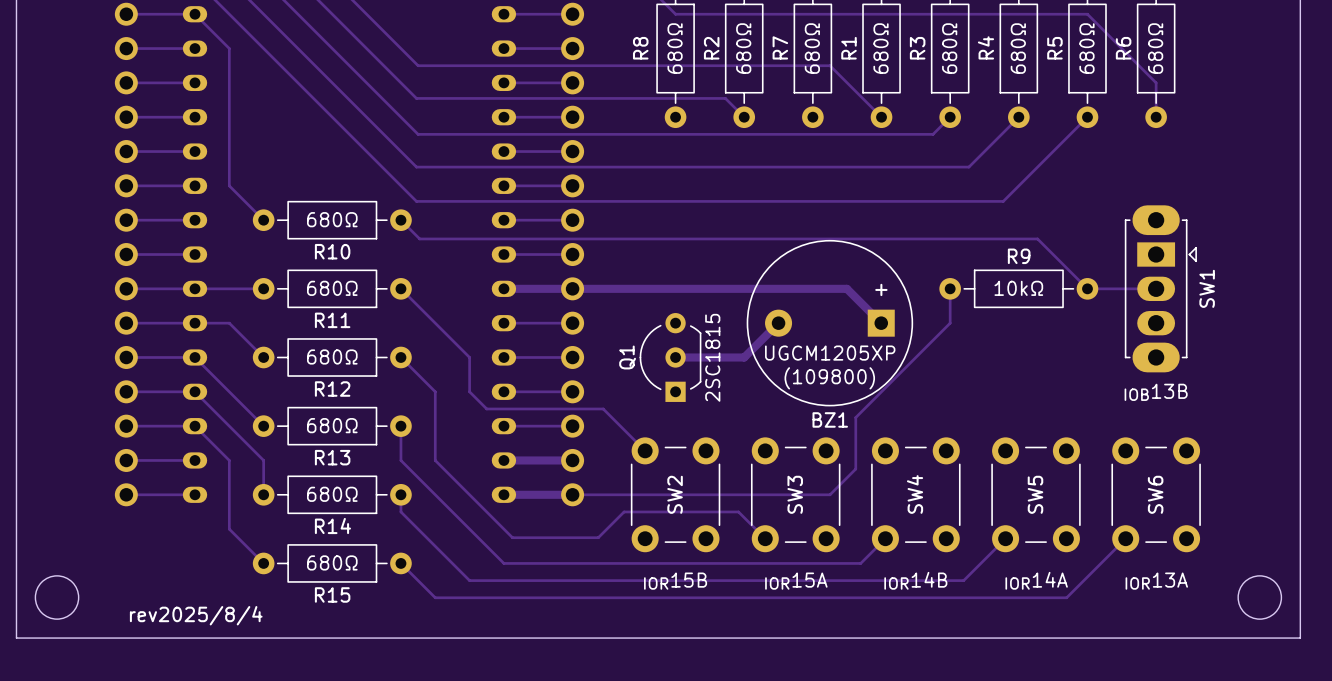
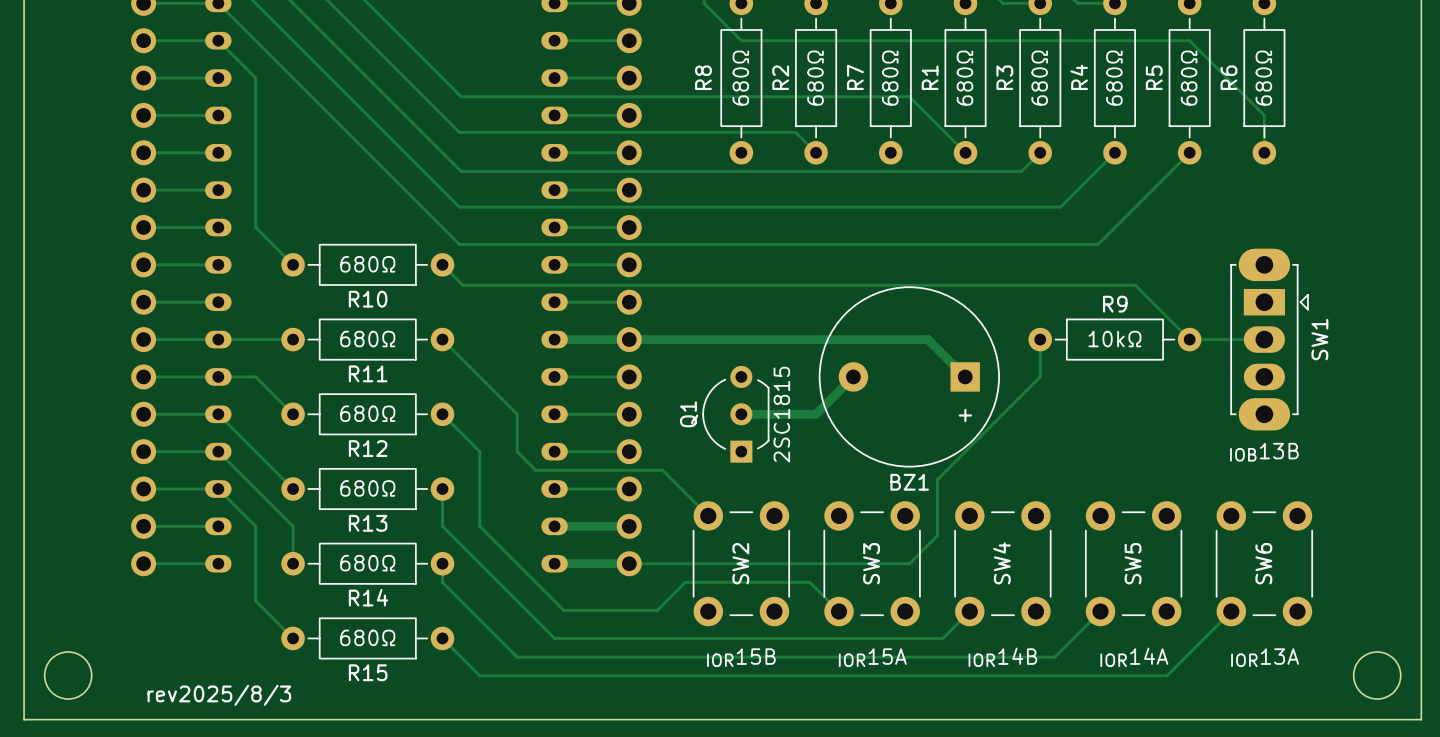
BZ1 text position: + (881, 289) -> + (965, 415)
BZ1 text: UGCM1205XP (830, 353) -> none
BZ1 text: (109800) (829, 378) -> none
text: rev2025/8/4 (196, 615) -> rev2025/8/3 (219, 695)

